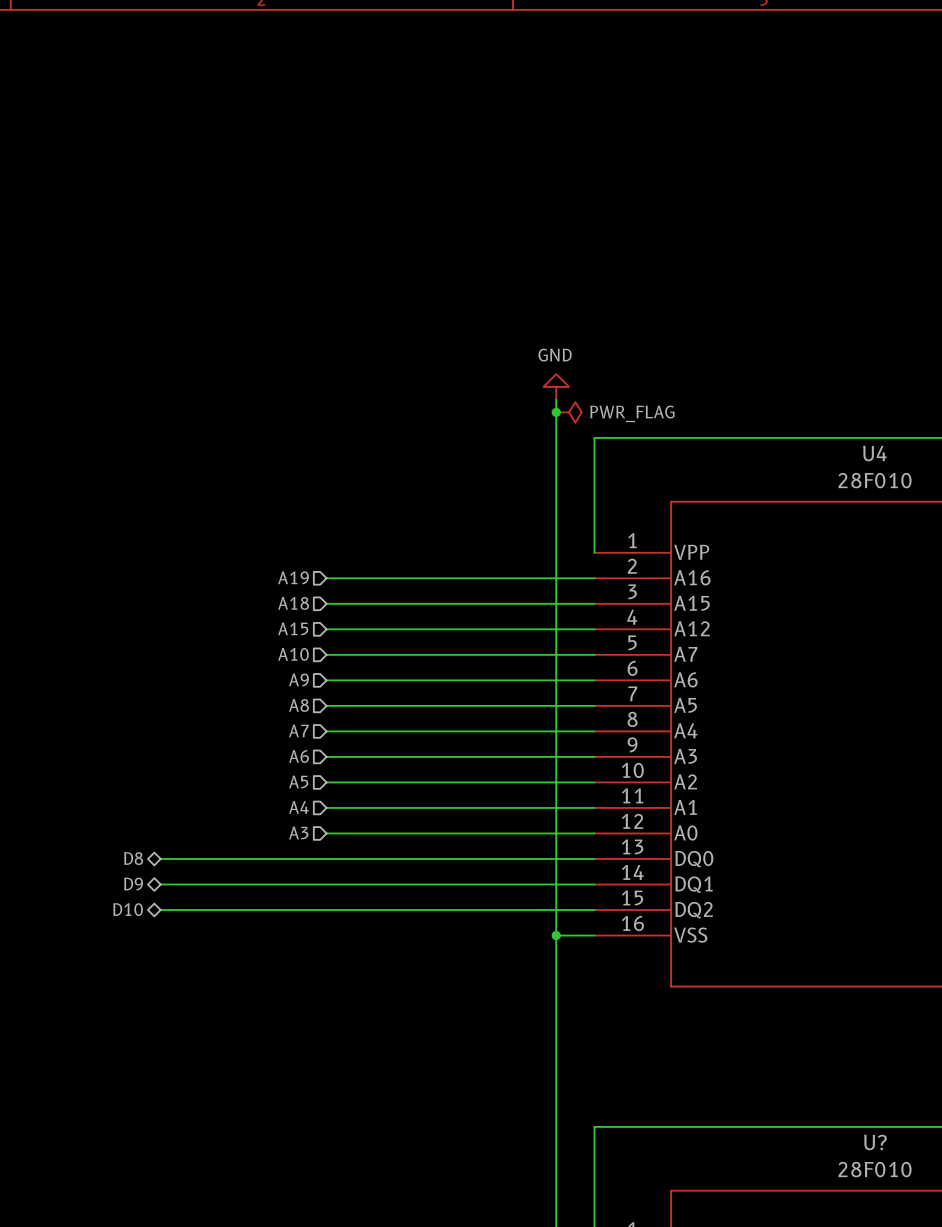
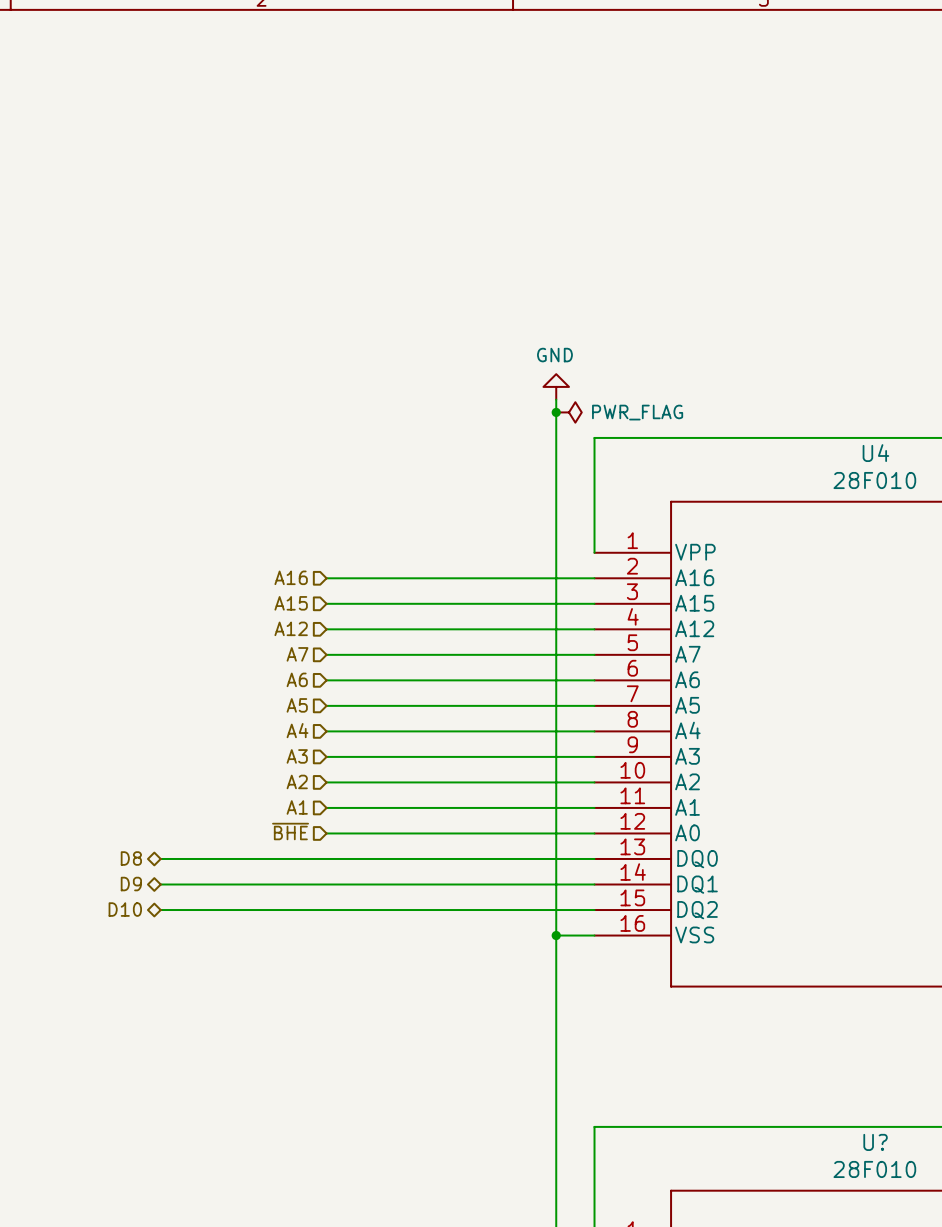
hierarchical label: A19 (293, 577) -> A16 (291, 577)
hierarchical label: A18 (293, 603) -> A15 (291, 603)
hierarchical label: A15 (293, 628) -> A12 (291, 628)
hierarchical label: A10 (293, 654) -> A7 (297, 654)
hierarchical label: A9 (298, 679) -> A6 (297, 679)
hierarchical label: A8 (299, 705) -> A5 (297, 705)
hierarchical label: A7 (298, 730) -> A4 (297, 730)
hierarchical label: A6 (299, 756) -> A3 (297, 756)
hierarchical label: A5 (298, 781) -> A2 (297, 781)
hierarchical label: A4 (298, 807) -> A1 (297, 807)
hierarchical label: A3 (298, 832) -> ~{BHE} (290, 831)

